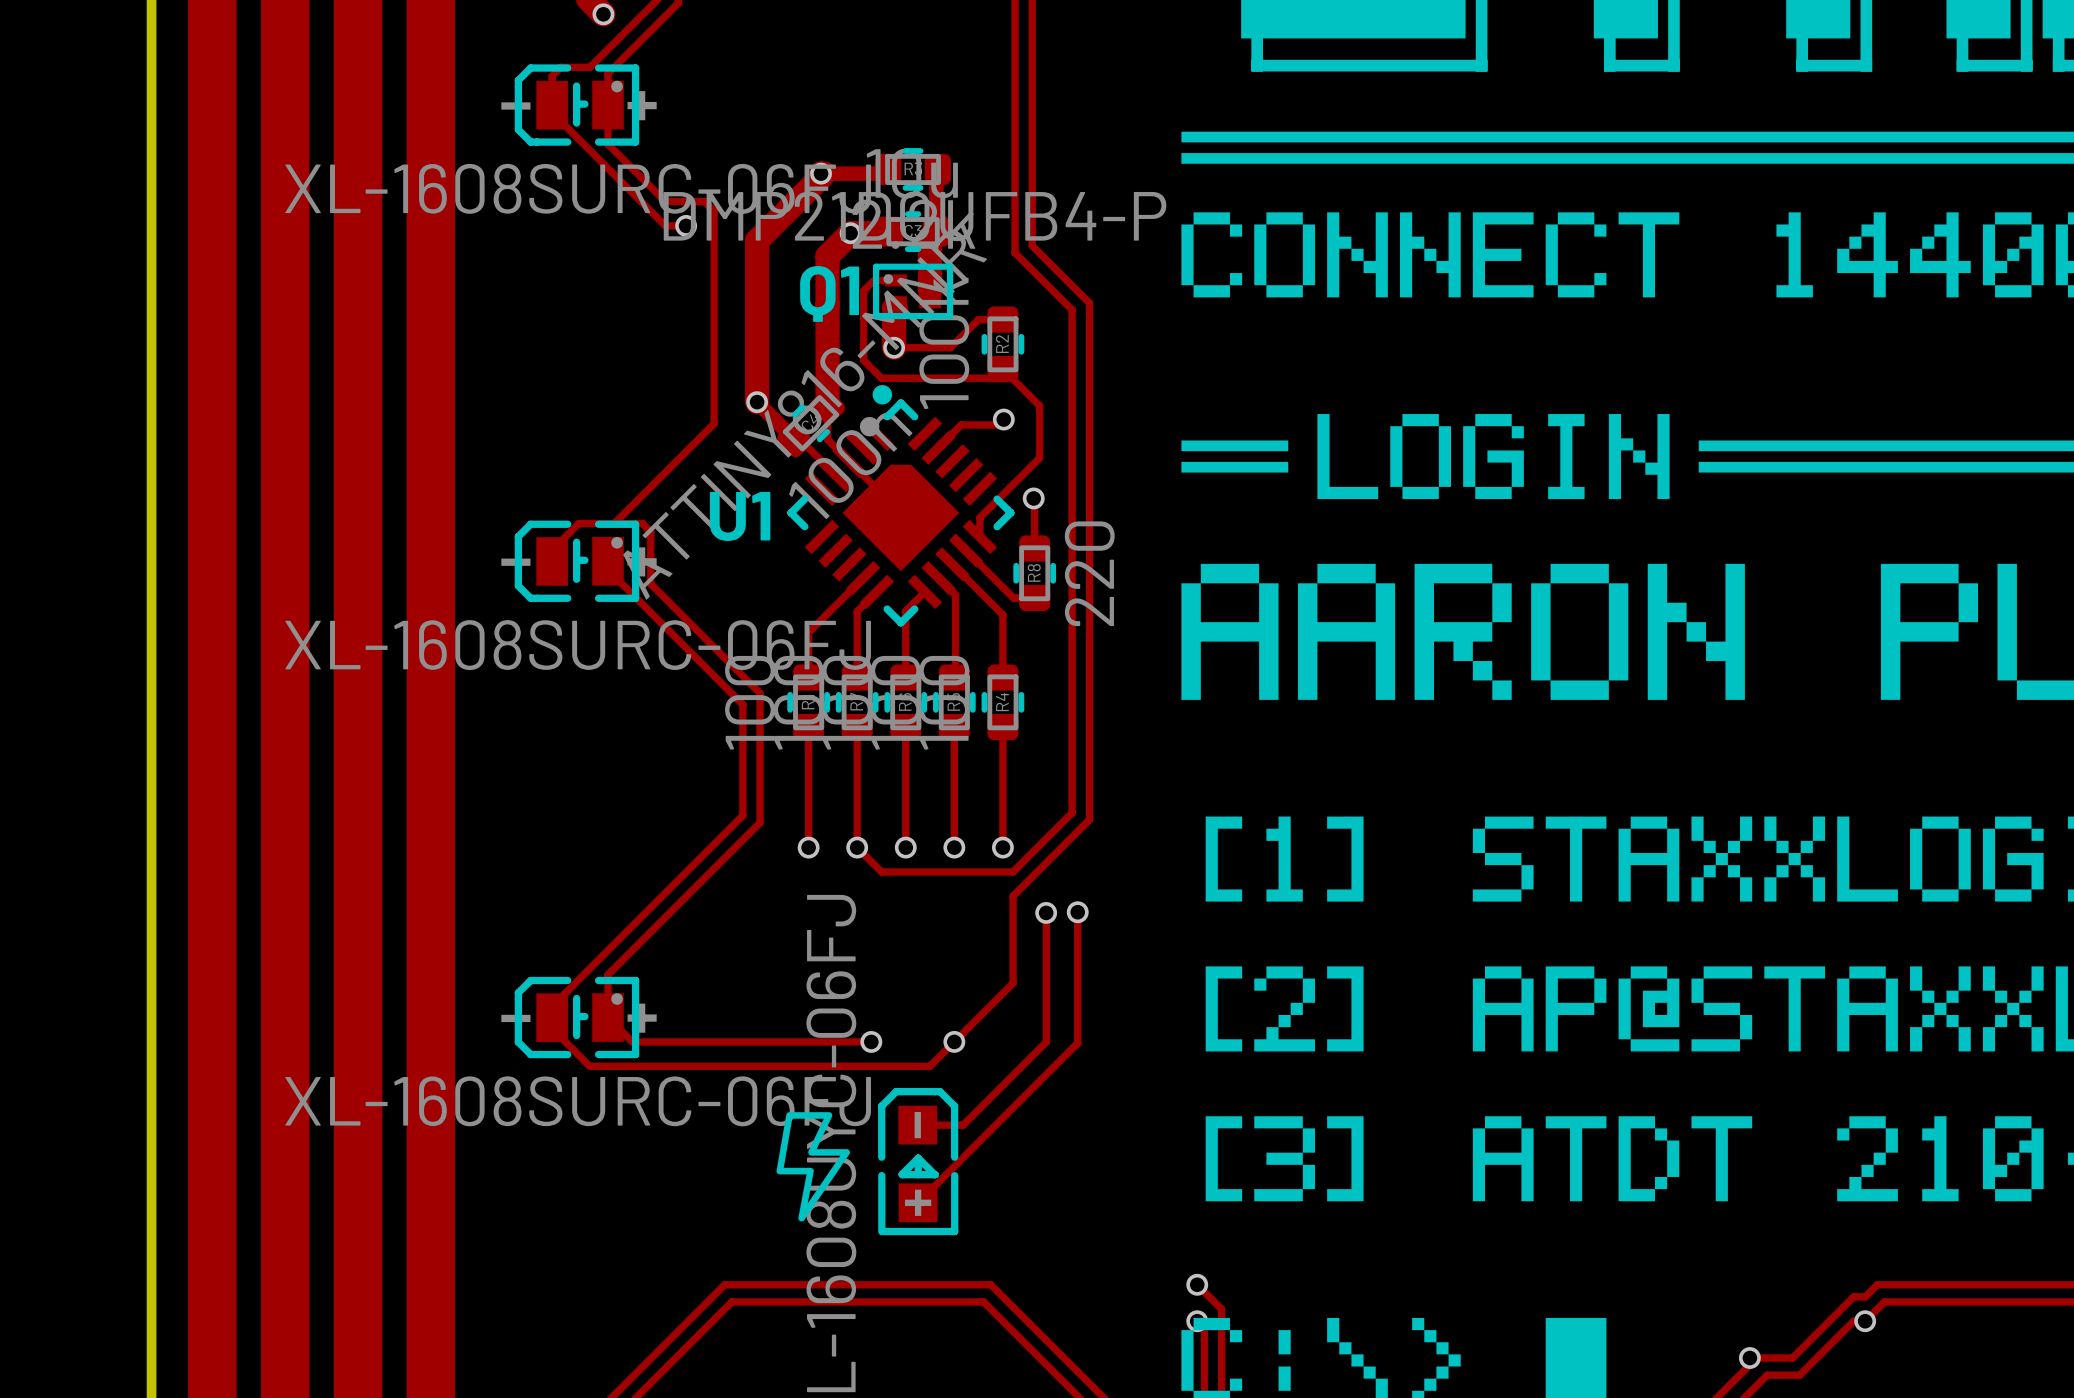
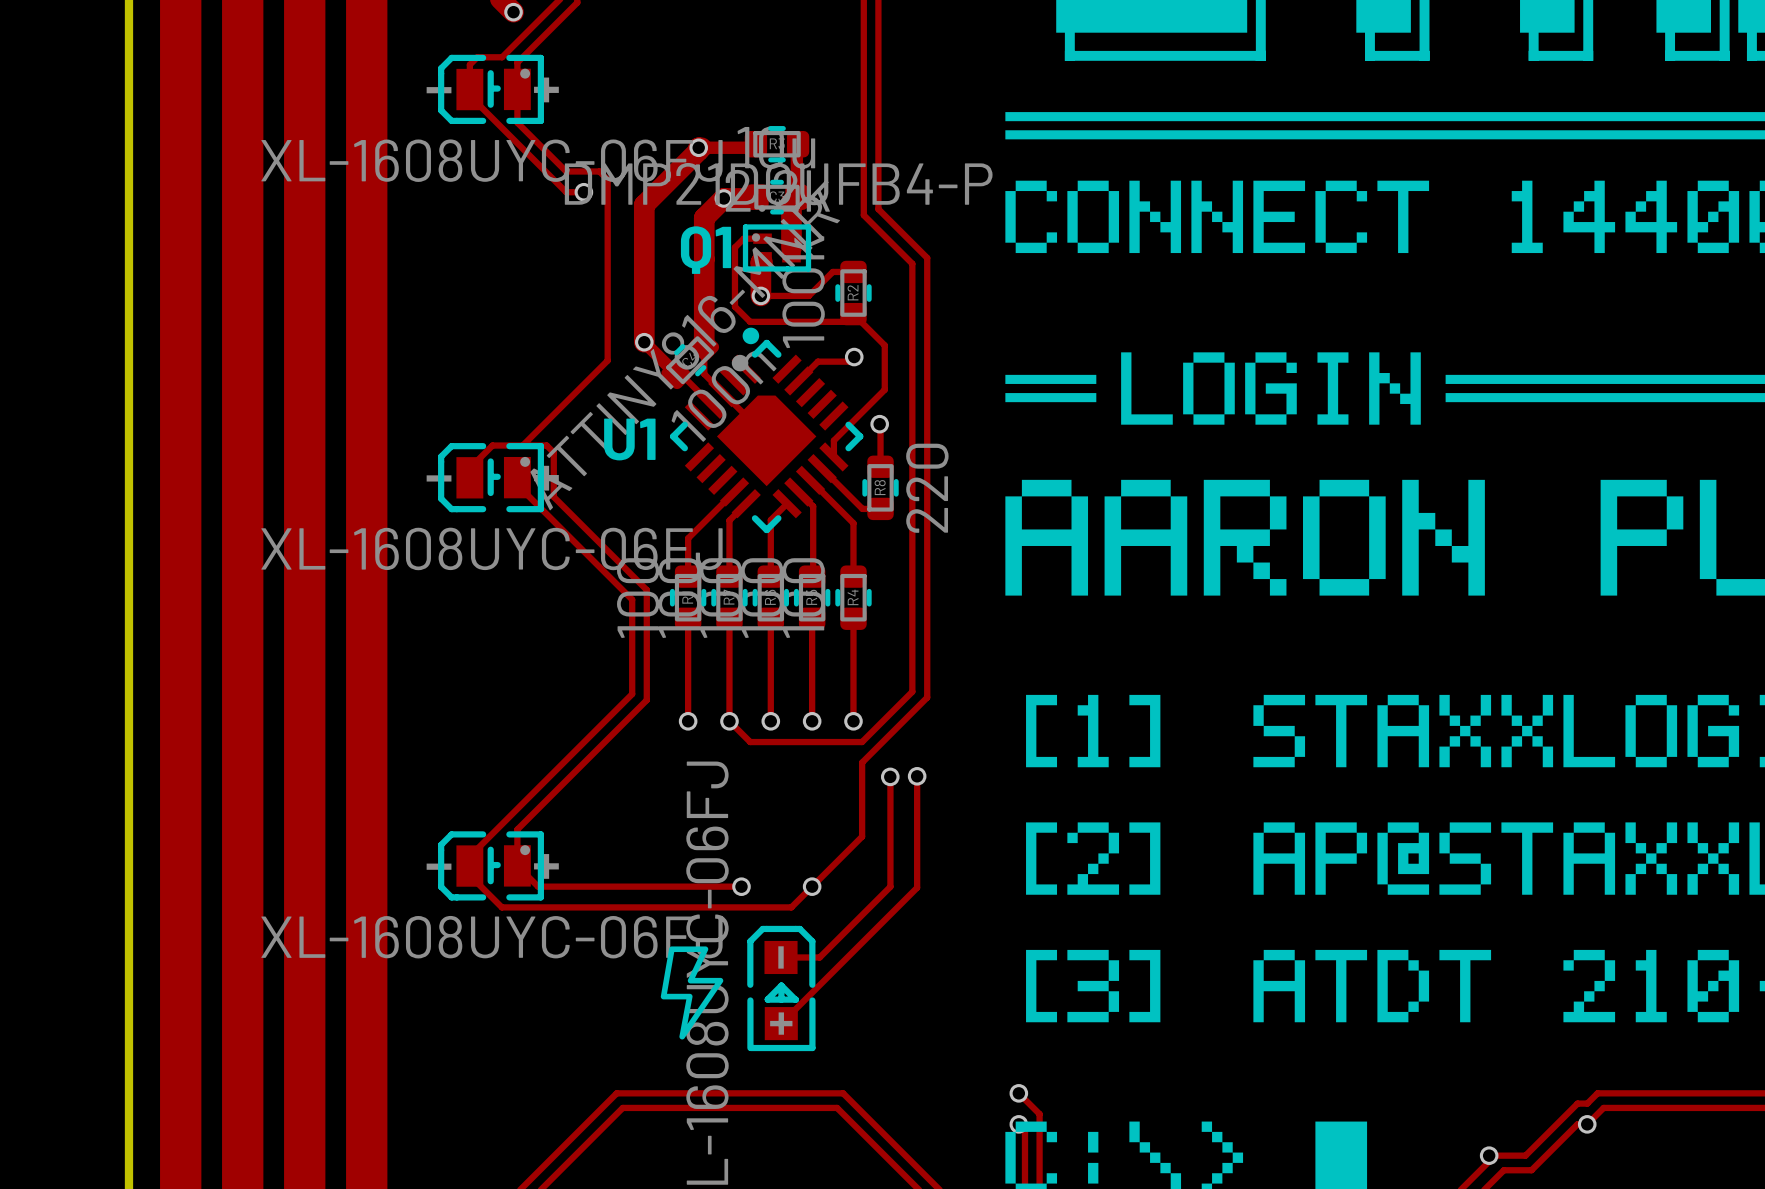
part value: XL-1608SURC-06FJ (578, 188) -> XL-1608UYC-06FJ (491, 160)
part value: XL-1608SURC-06FJ (578, 645) -> XL-1608UYC-06FJ (491, 548)
part value: XL-1608SURC-06FJ (578, 1101) -> XL-1608UYC-06FJ (491, 937)

